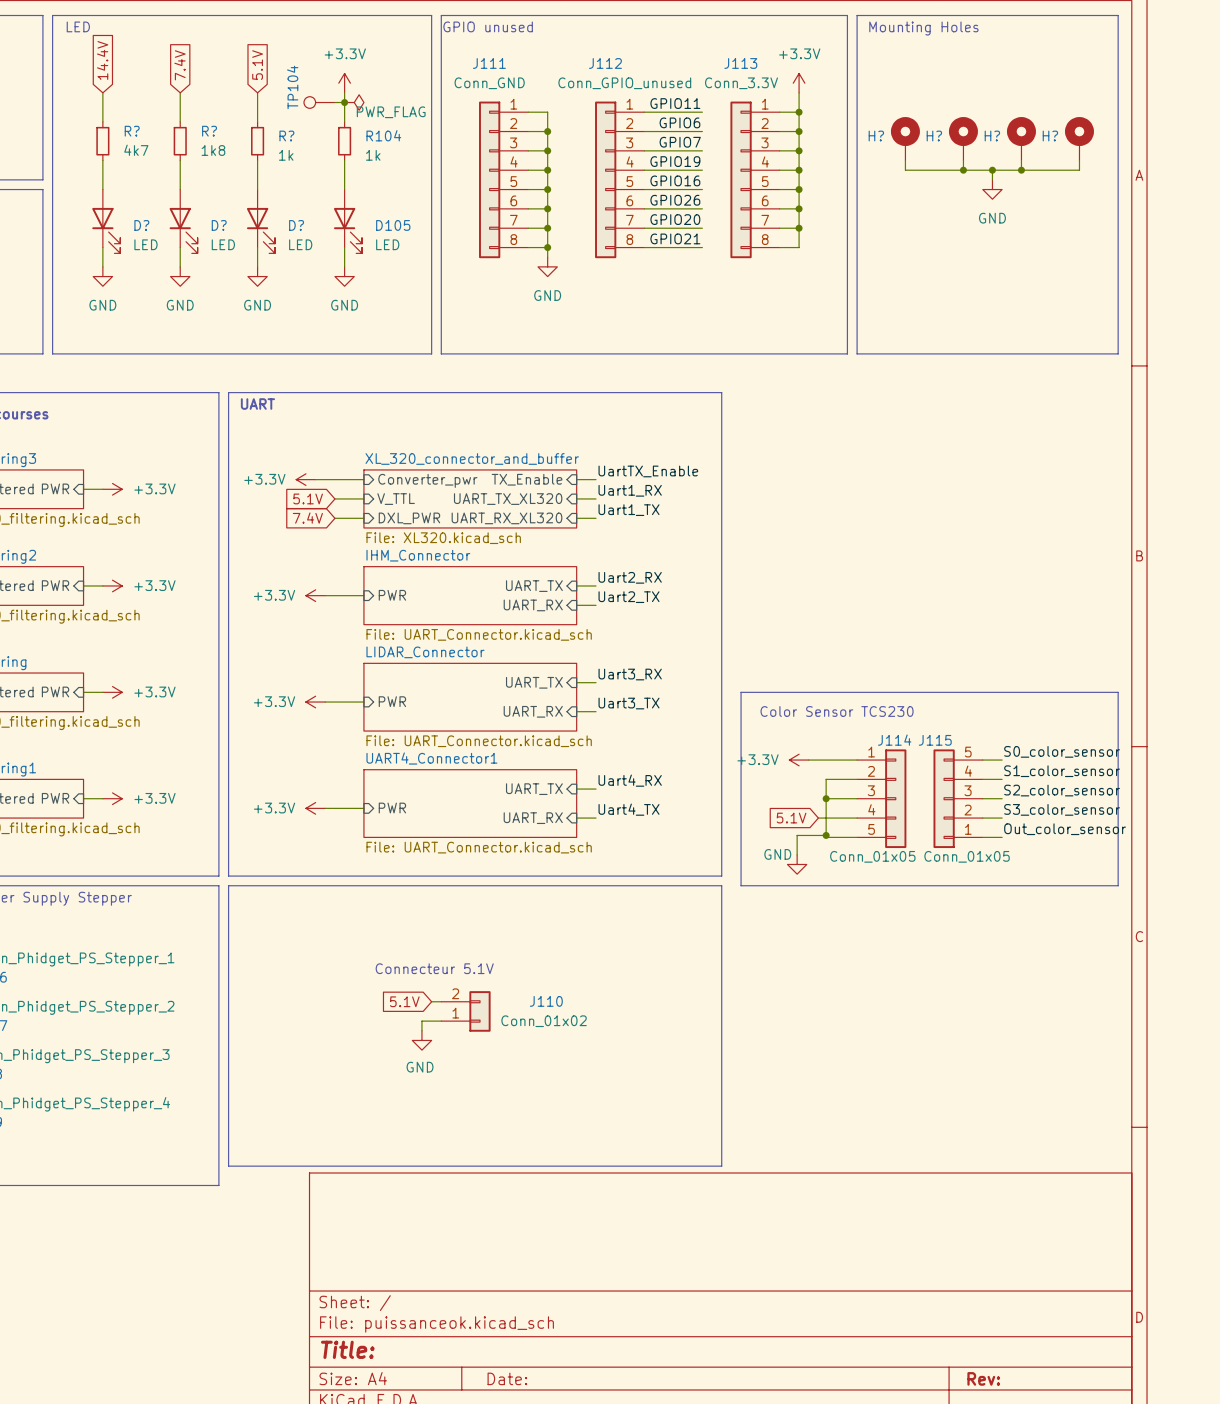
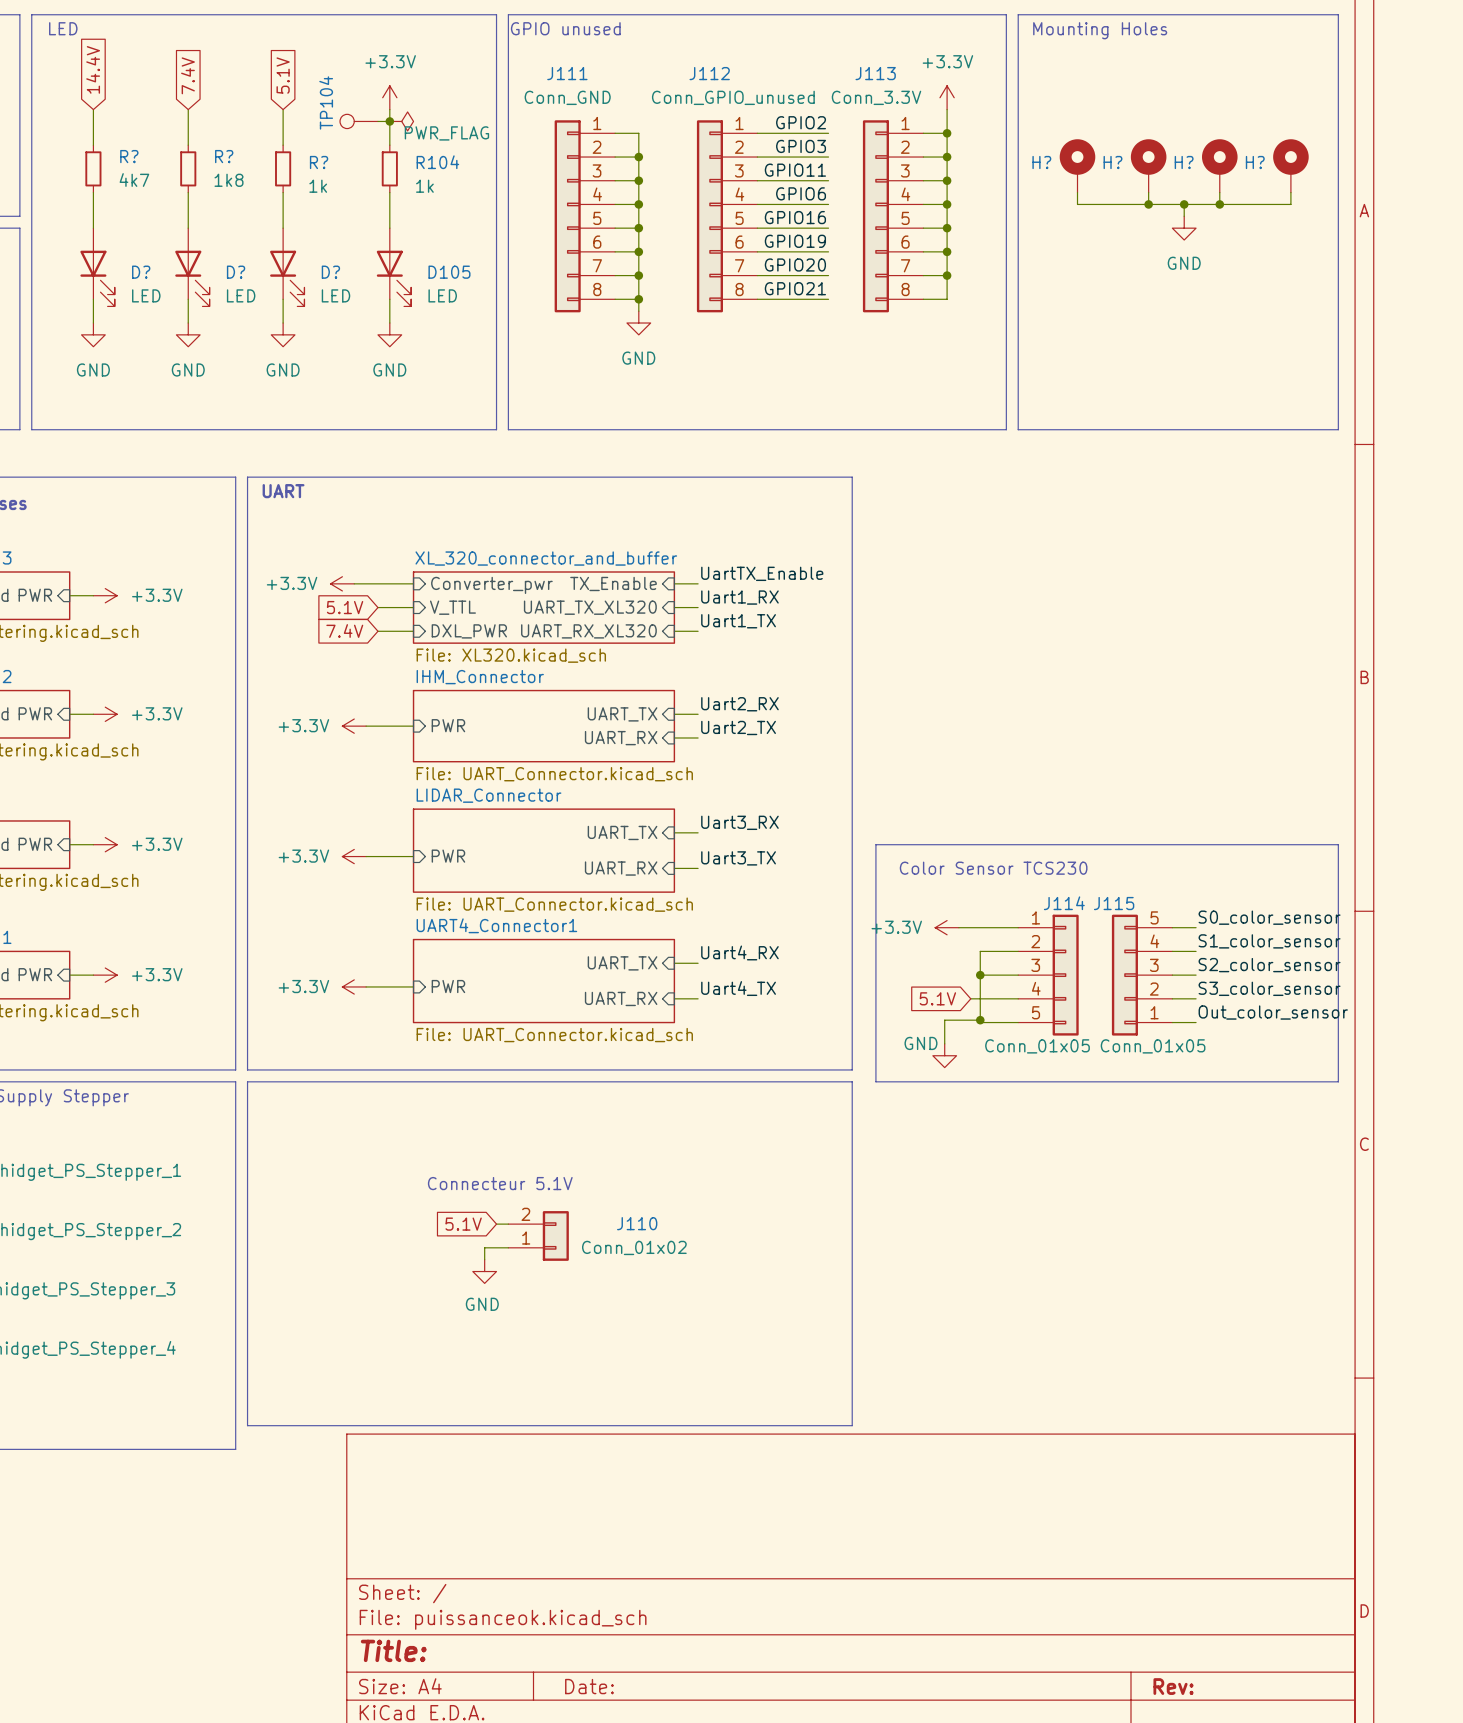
label: GPIO11 (675, 103) -> GPIO2 (801, 122)
label: GPIO6 (679, 122) -> GPIO3 (801, 146)
label: GPIO7 (680, 142) -> GPIO11 (795, 170)
label: GPIO19 (675, 161) -> GPIO6 (801, 193)
label: GPIO26 (675, 200) -> GPIO19 (795, 241)

